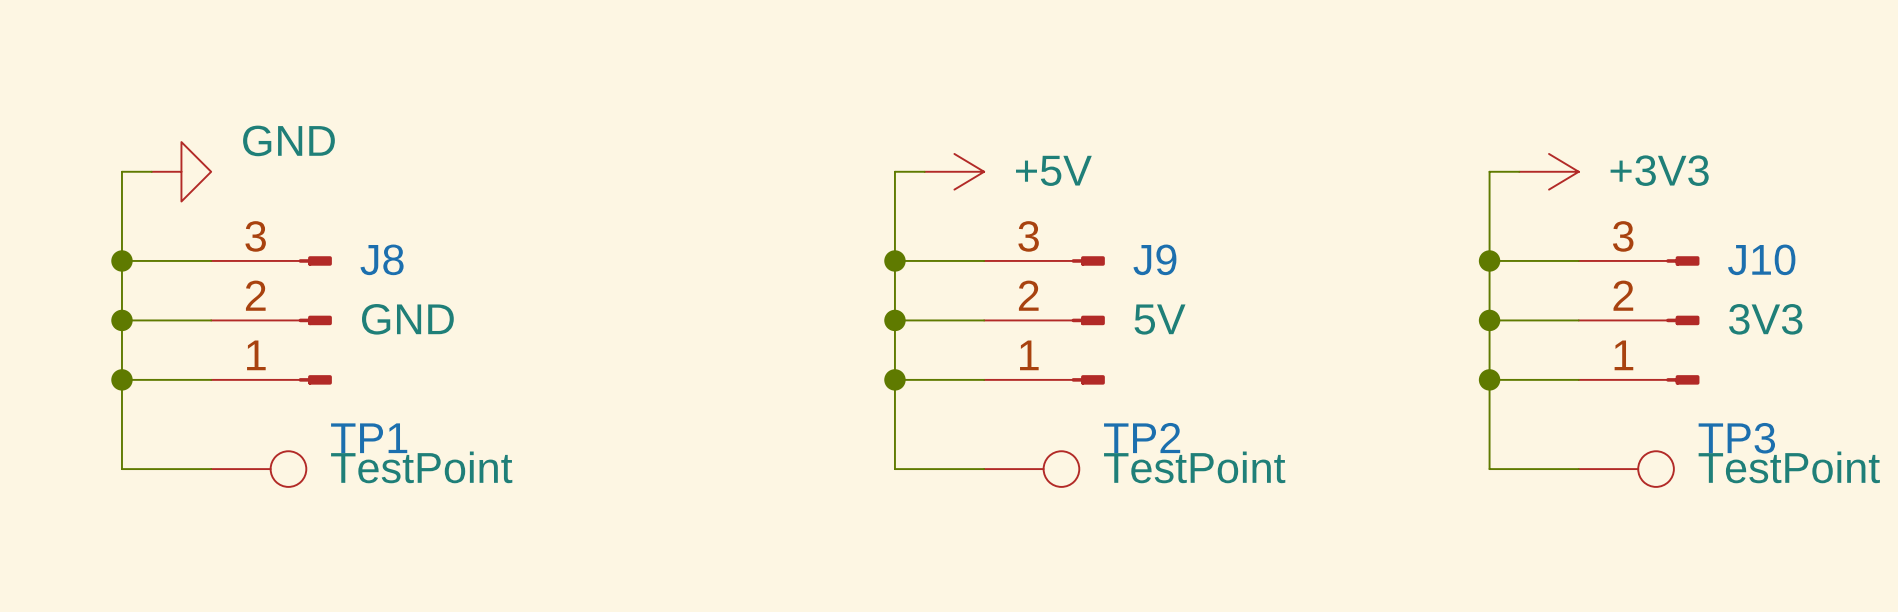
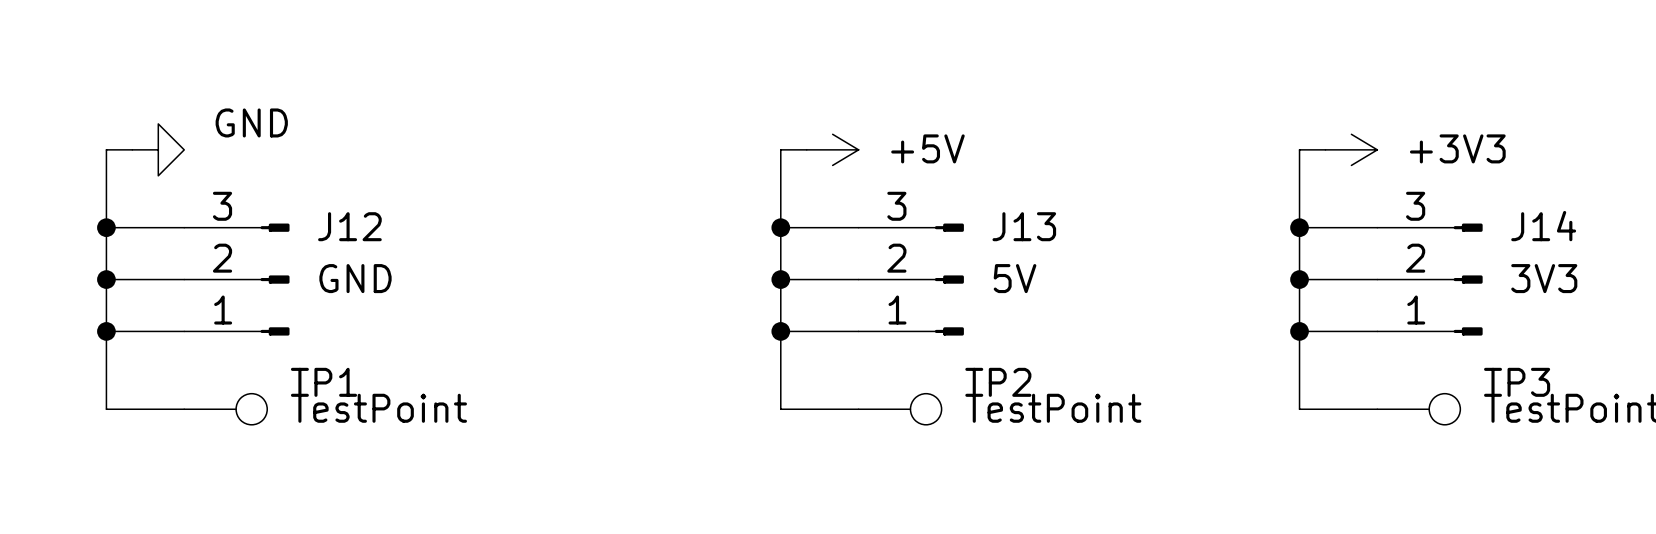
J8 name: J8 (382, 259) -> J12 (349, 226)
J9 name: J9 (1154, 259) -> J13 (1024, 226)
J10 name: J10 (1761, 259) -> J14 (1543, 226)

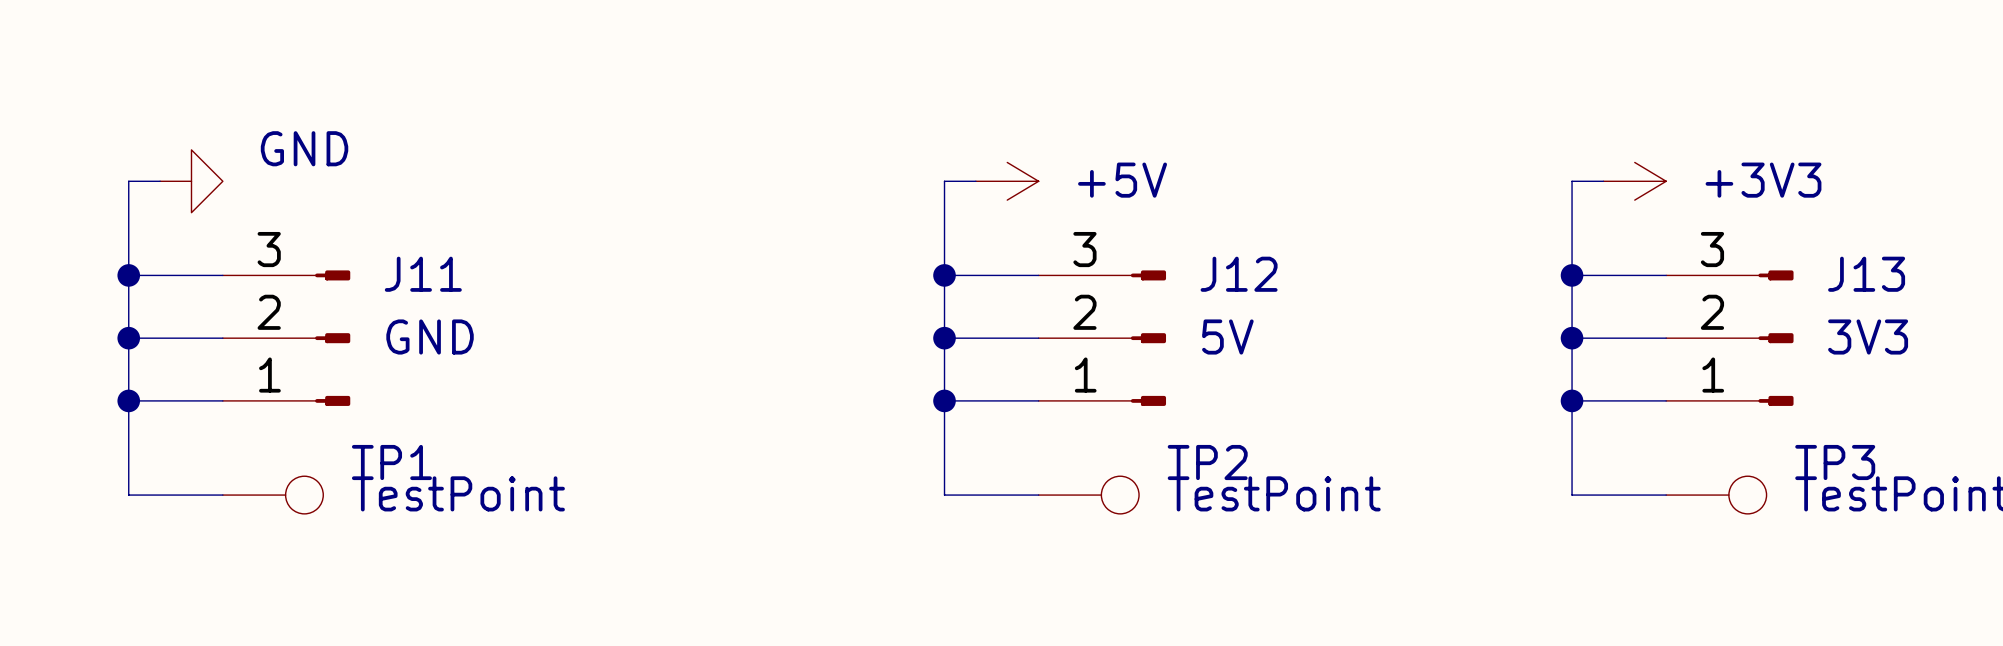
J12 name: J12 (349, 226) -> J11 (423, 274)
J13 name: J13 (1024, 226) -> J12 (1239, 274)
J14 name: J14 (1543, 226) -> J13 (1866, 274)

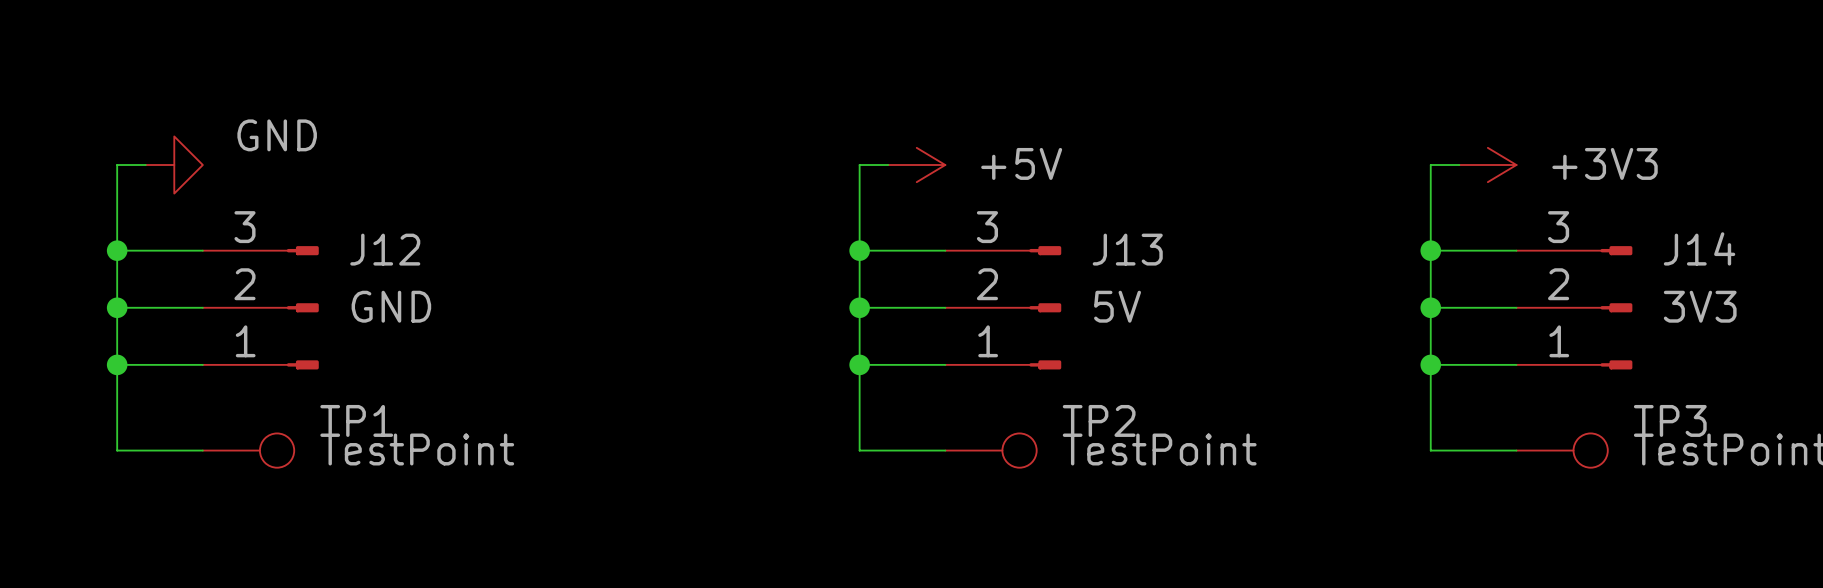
J11 name: J11 (423, 274) -> J12 (385, 249)
J12 name: J12 (1239, 274) -> J13 (1127, 249)
J13 name: J13 (1866, 274) -> J14 (1699, 248)

